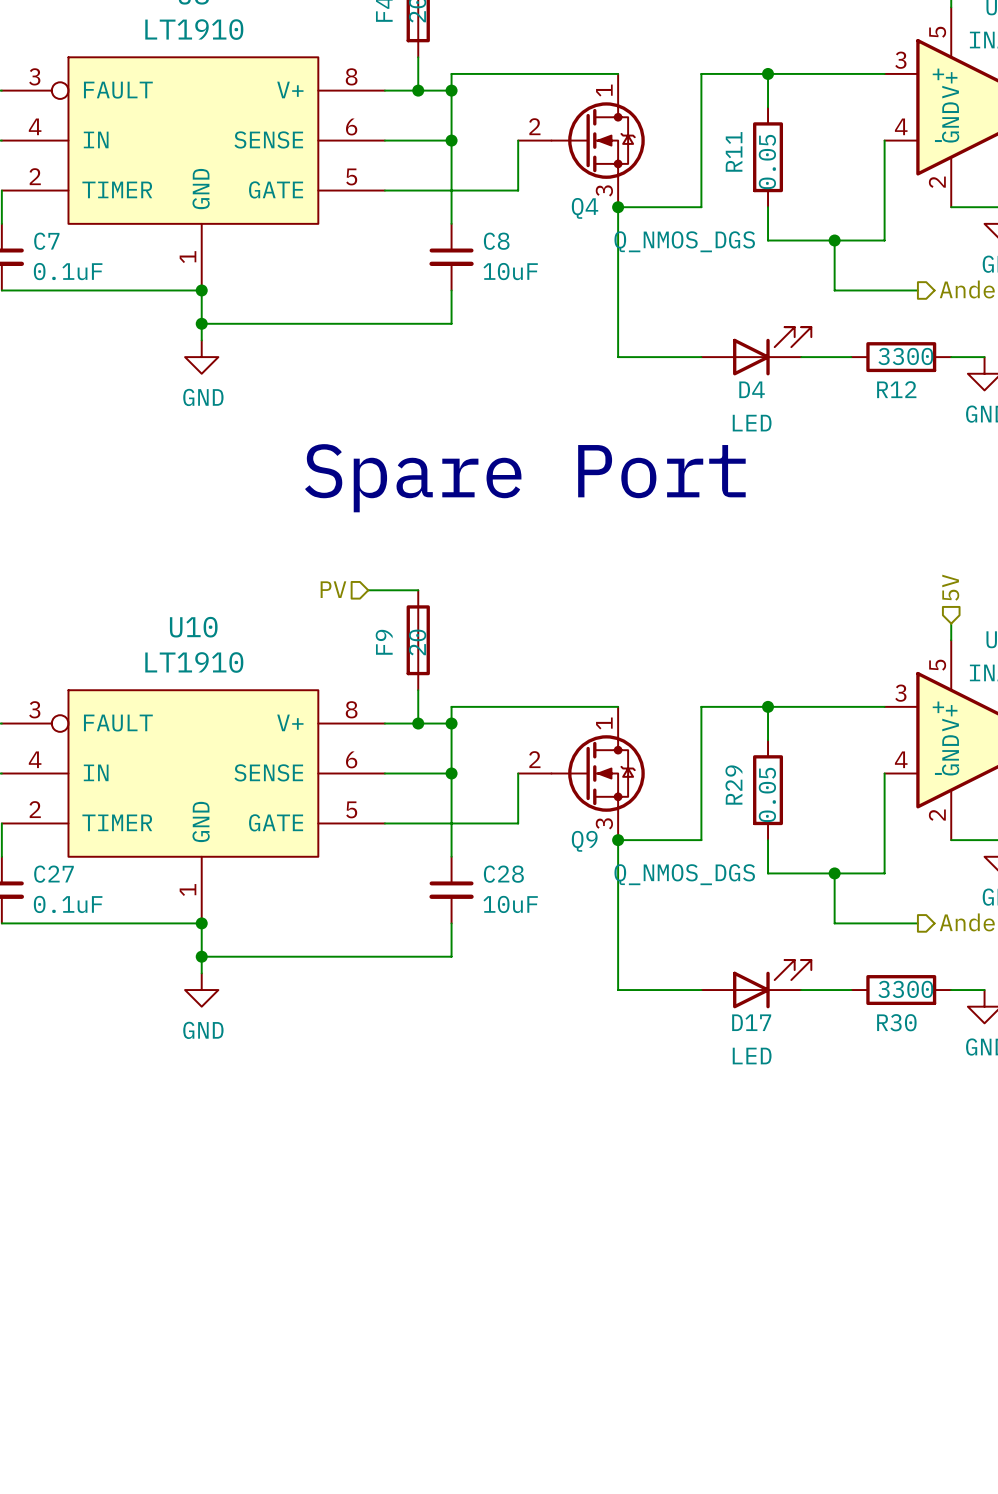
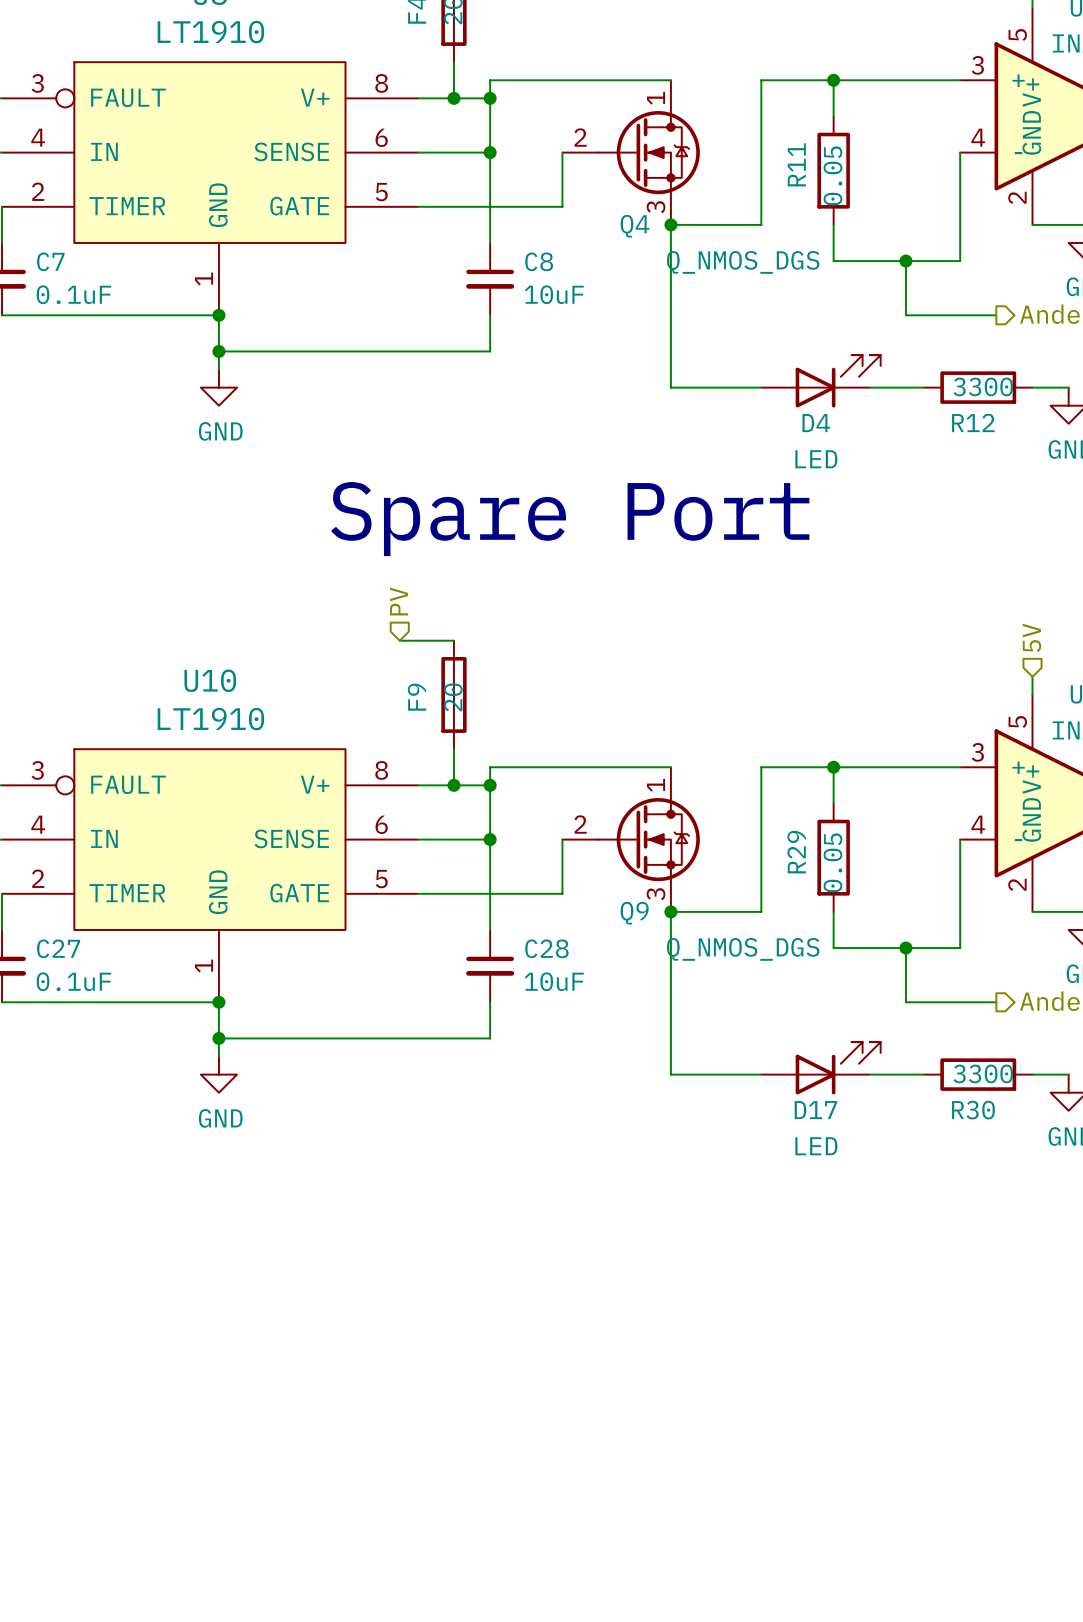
hierarchical label rotation: 0° (333, 589) -> 90° clockwise (399, 601)
hierarchical label position: PV (333, 589) -> PV (399, 601)

